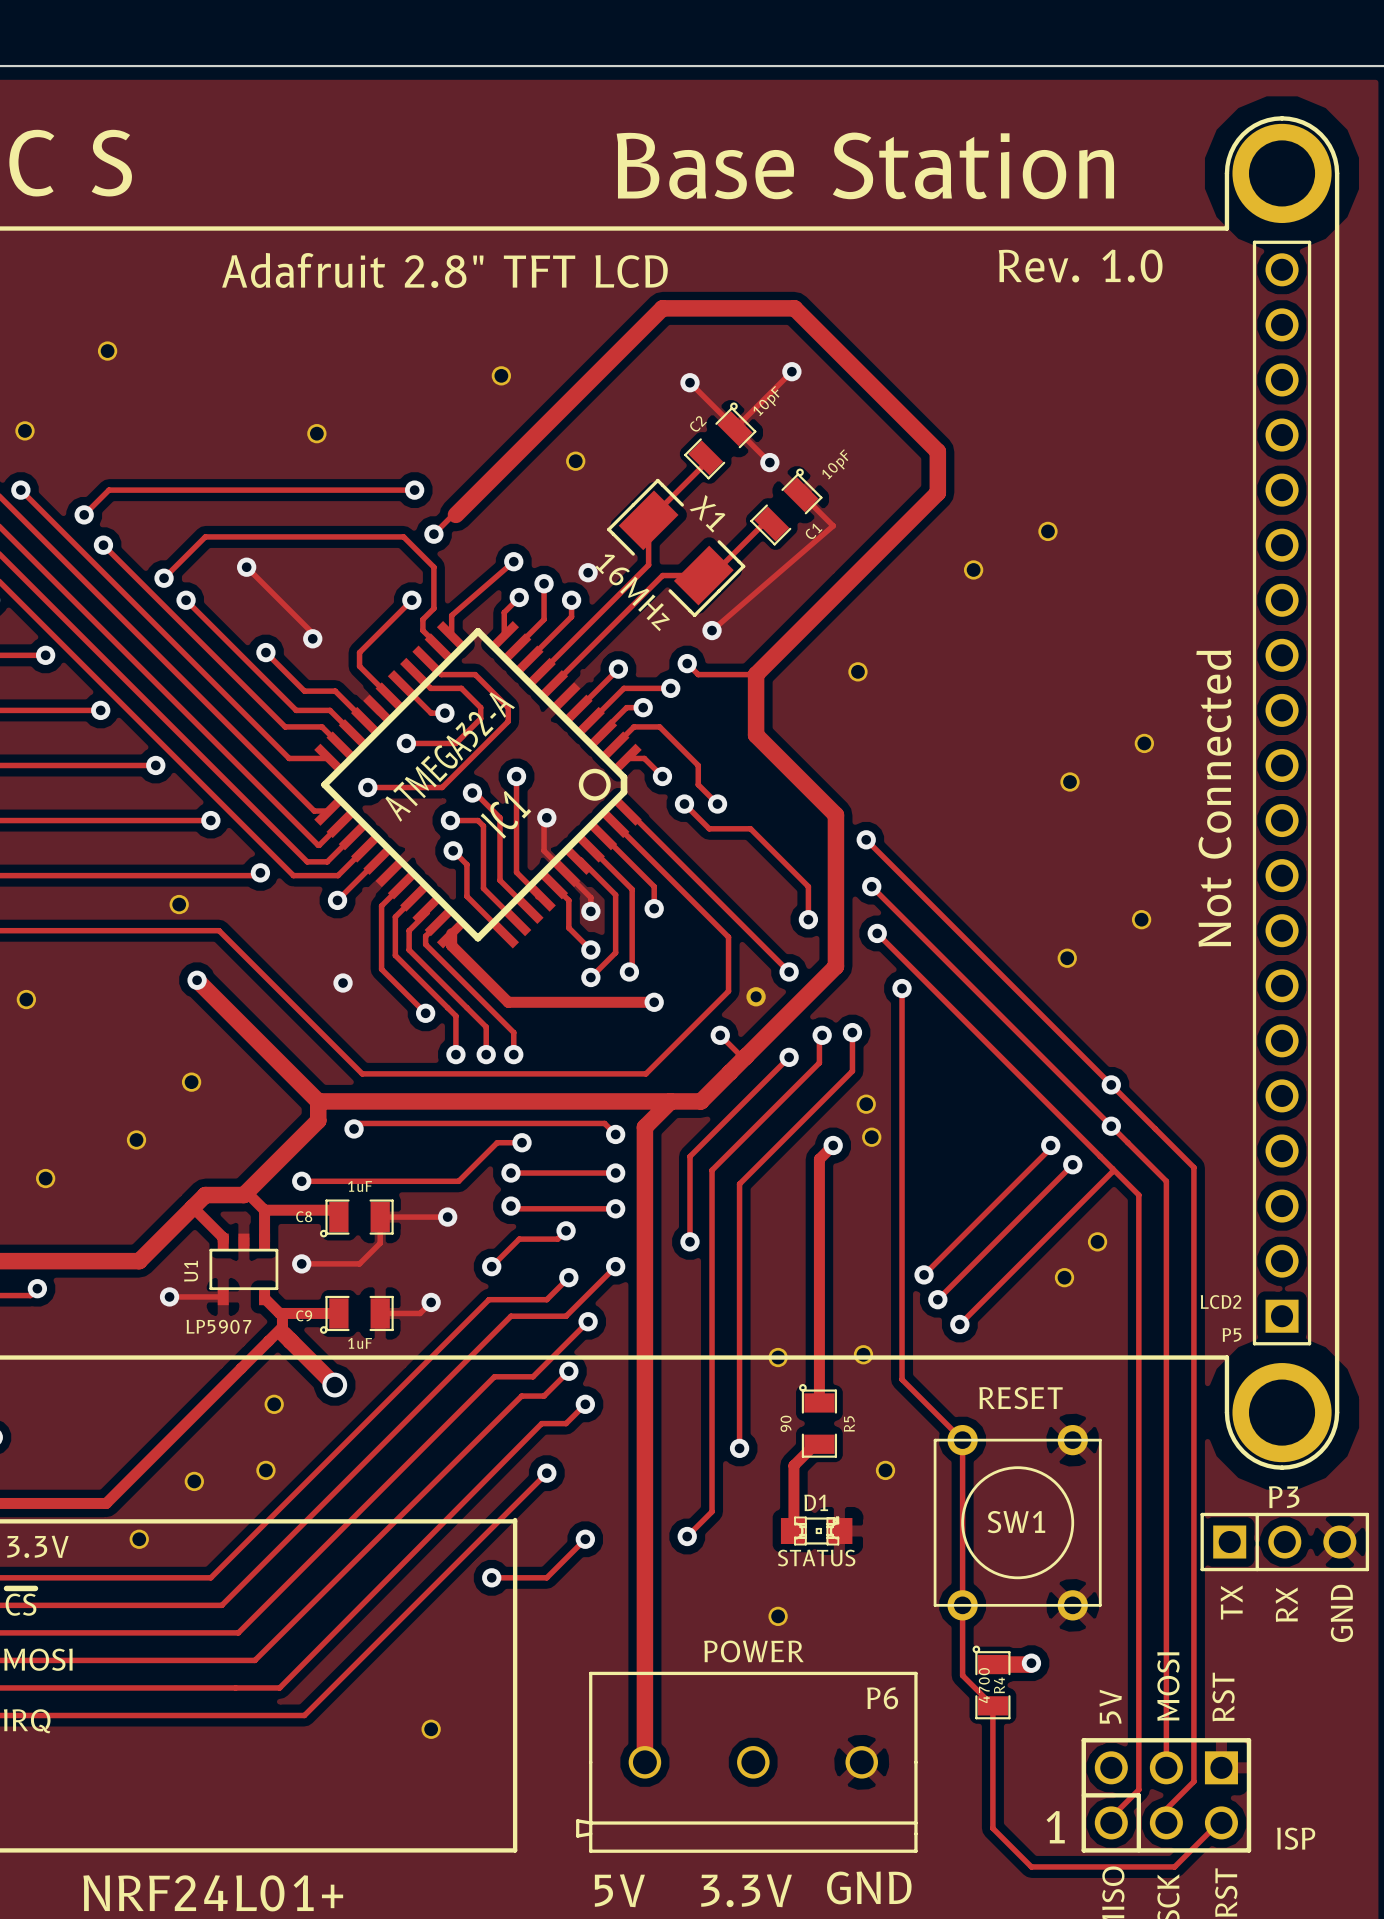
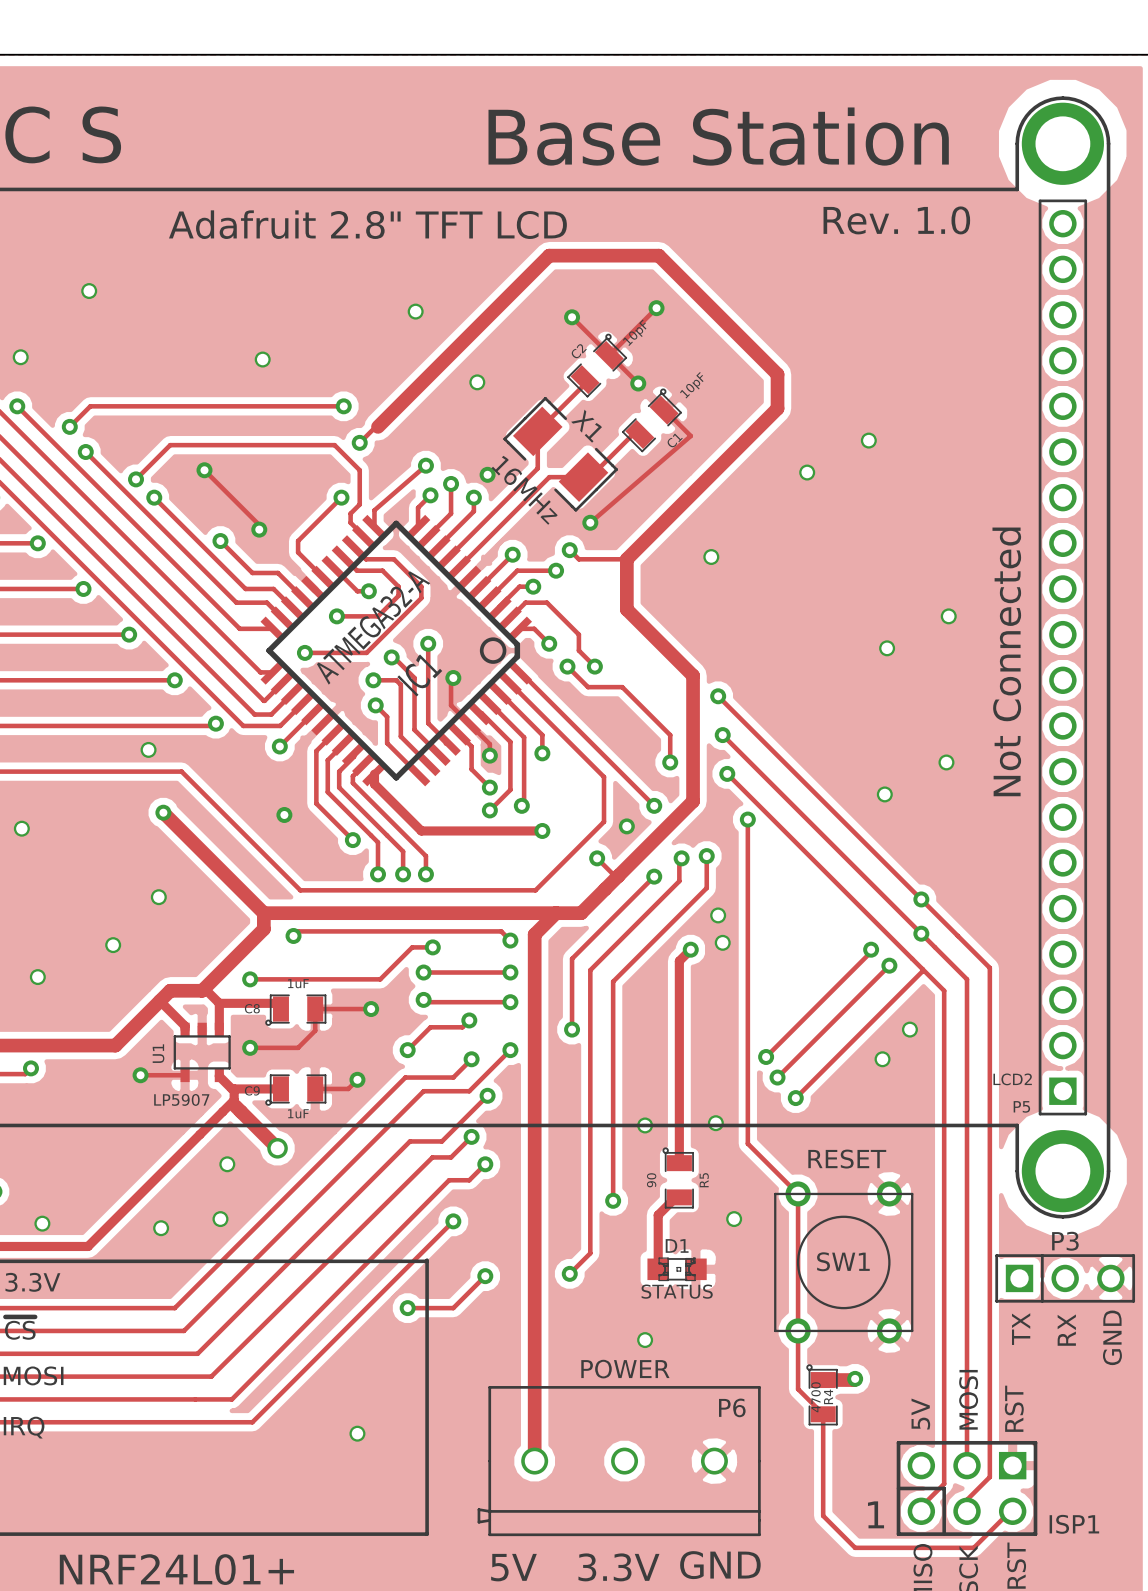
part position: (139, 1539) -> (42, 1223)
ISP name: ISP (1296, 1838) -> ISP1 (1074, 1524)

